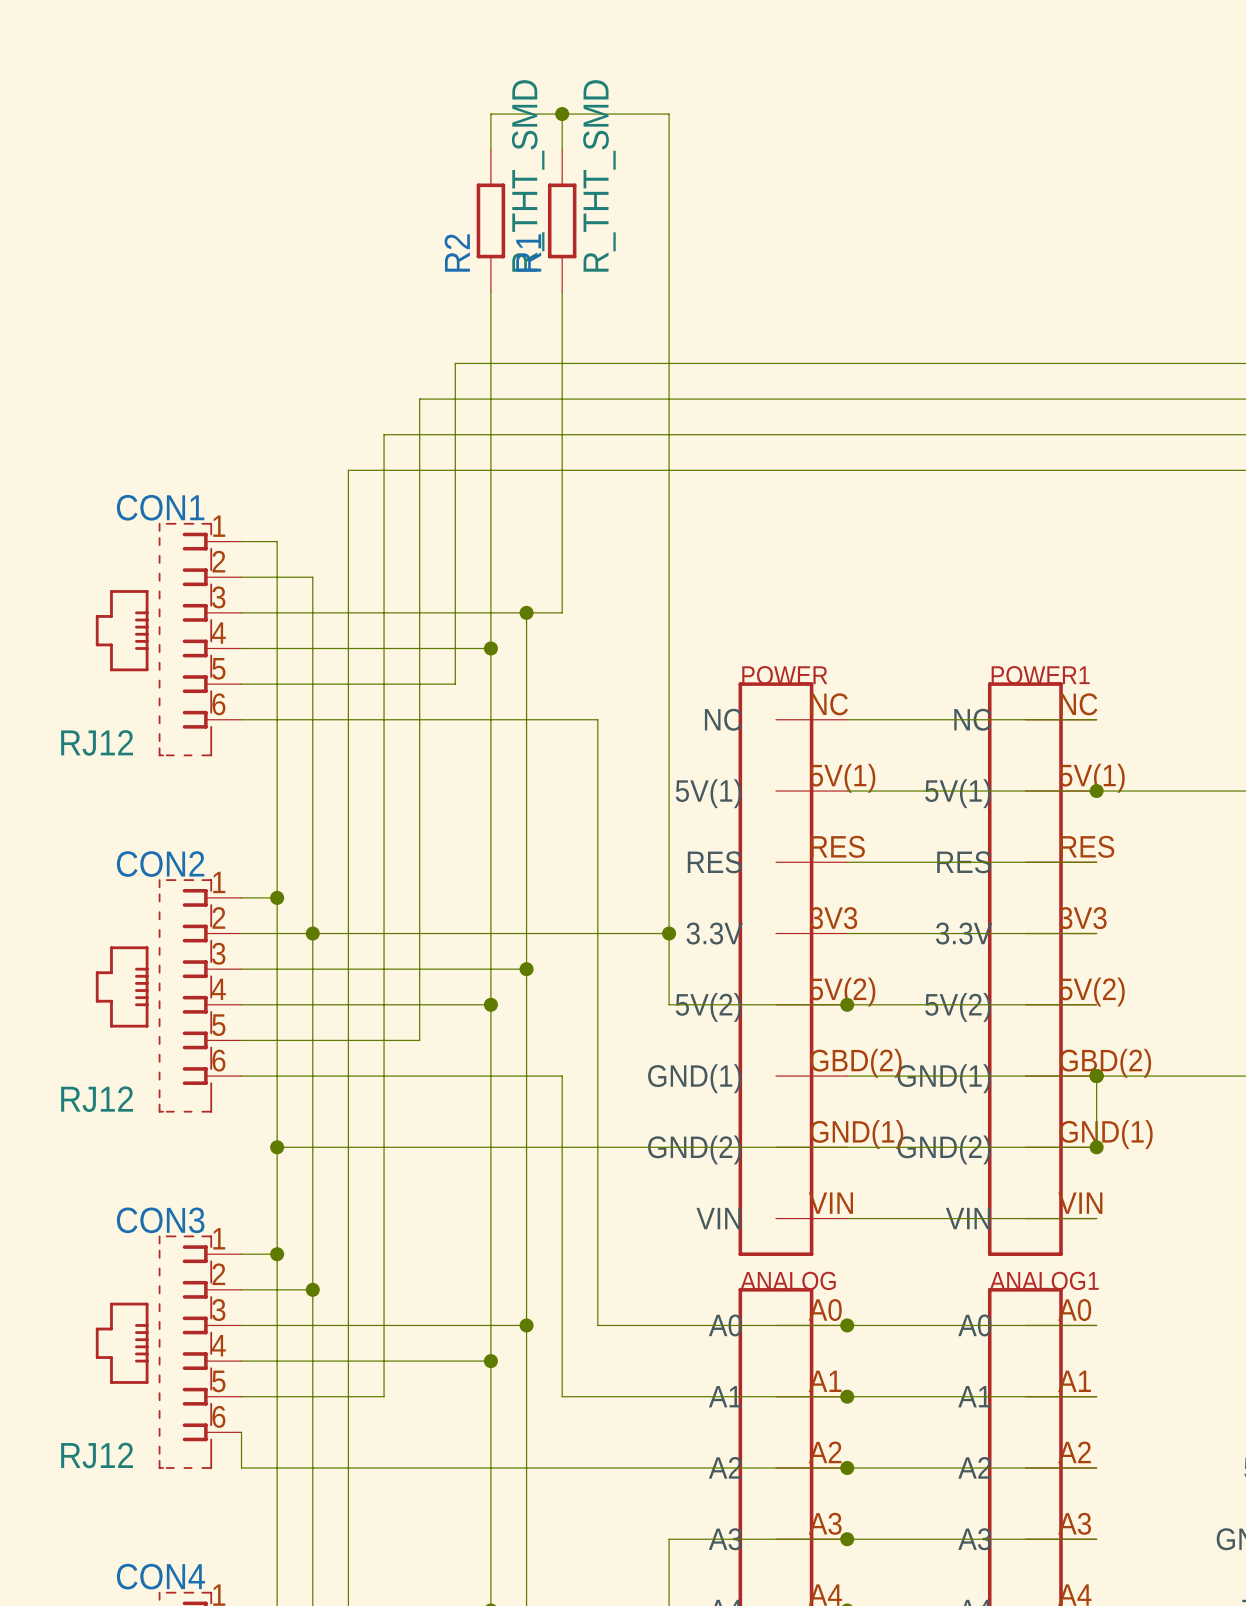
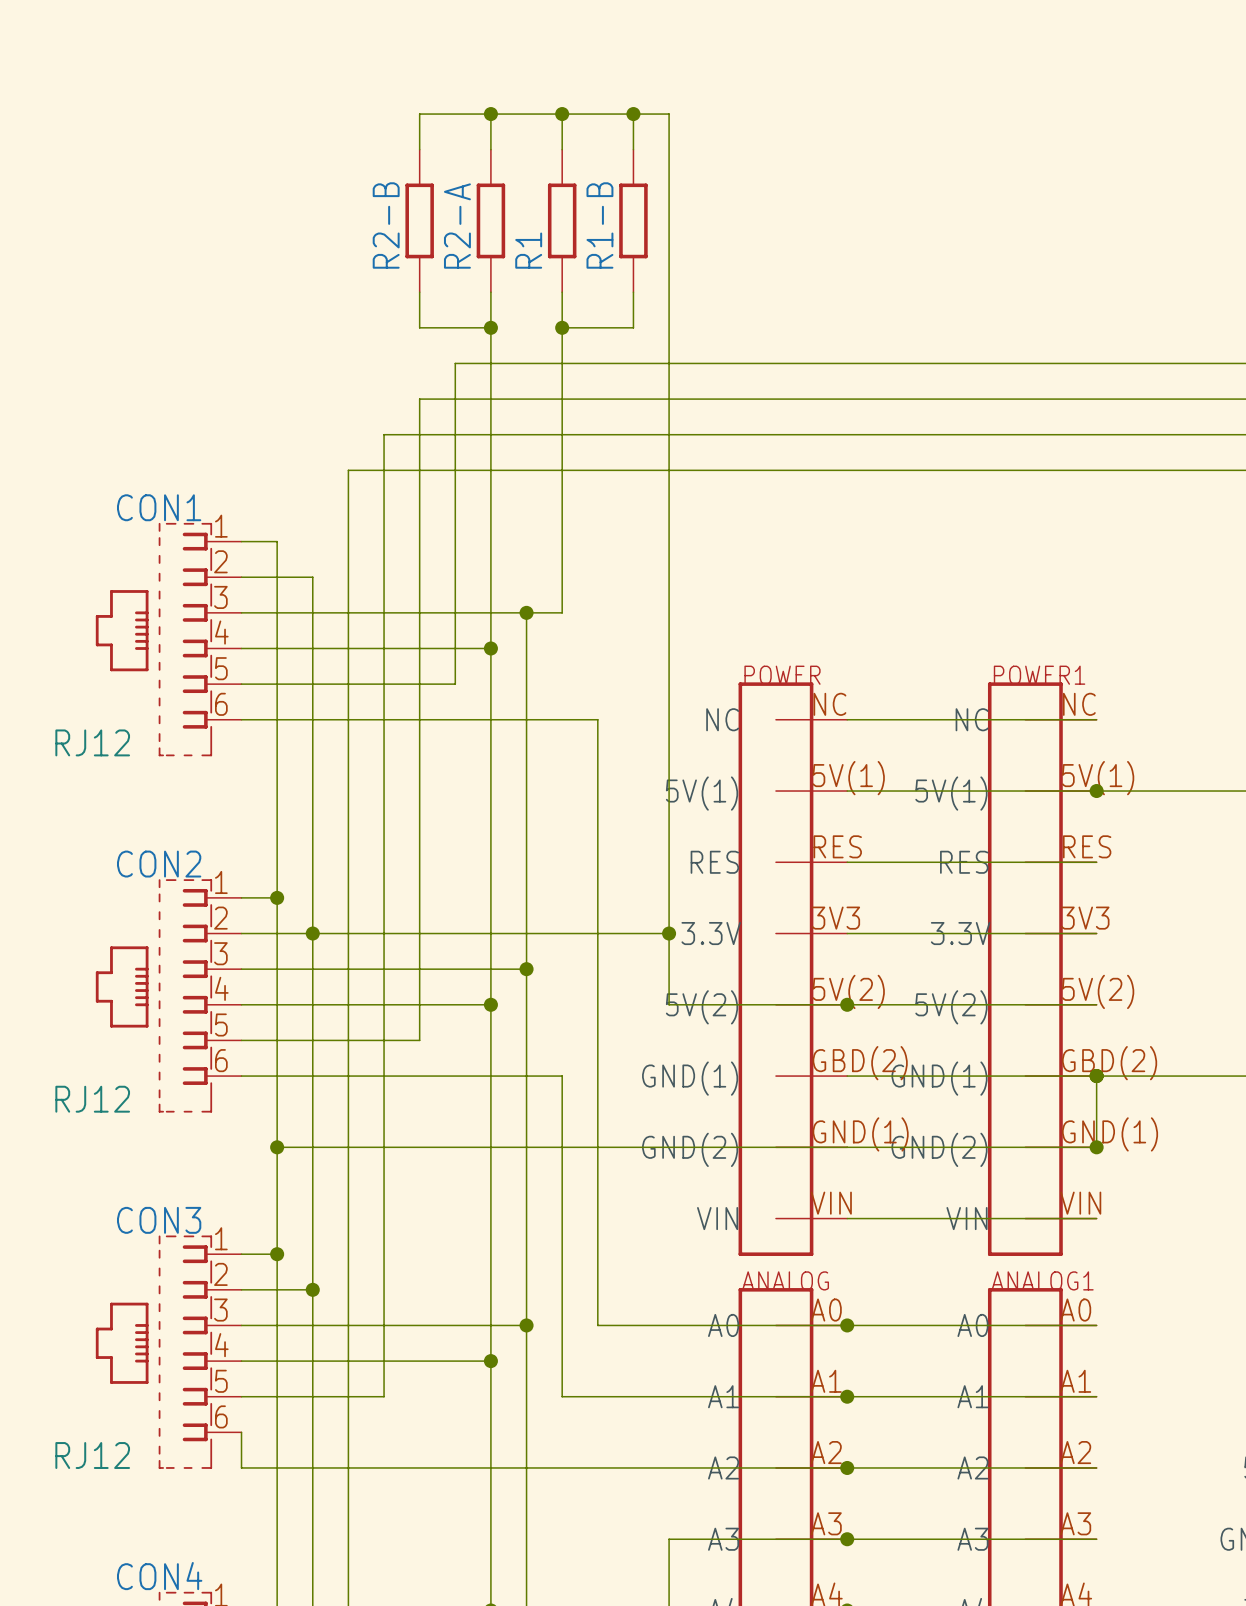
wire: none -> (490, 114) (419, 114) (419, 149)
junction: none -> (490, 114)
wire: none -> (633, 114) (633, 149)
junction: none -> (633, 114)
R2 value: R_THT_SMD (528, 175) -> none
R1 value: R_THT_SMD (599, 175) -> none
R2-B: none -> (419, 220)
R1-B: none -> (633, 220)
R2 name: R2 (457, 253) -> R2-A (457, 226)
wire: none -> (419, 292) (419, 327) (490, 327)
wire: none -> (633, 292) (633, 327) (562, 327)
junction: none -> (490, 327)
junction: none -> (562, 327)

